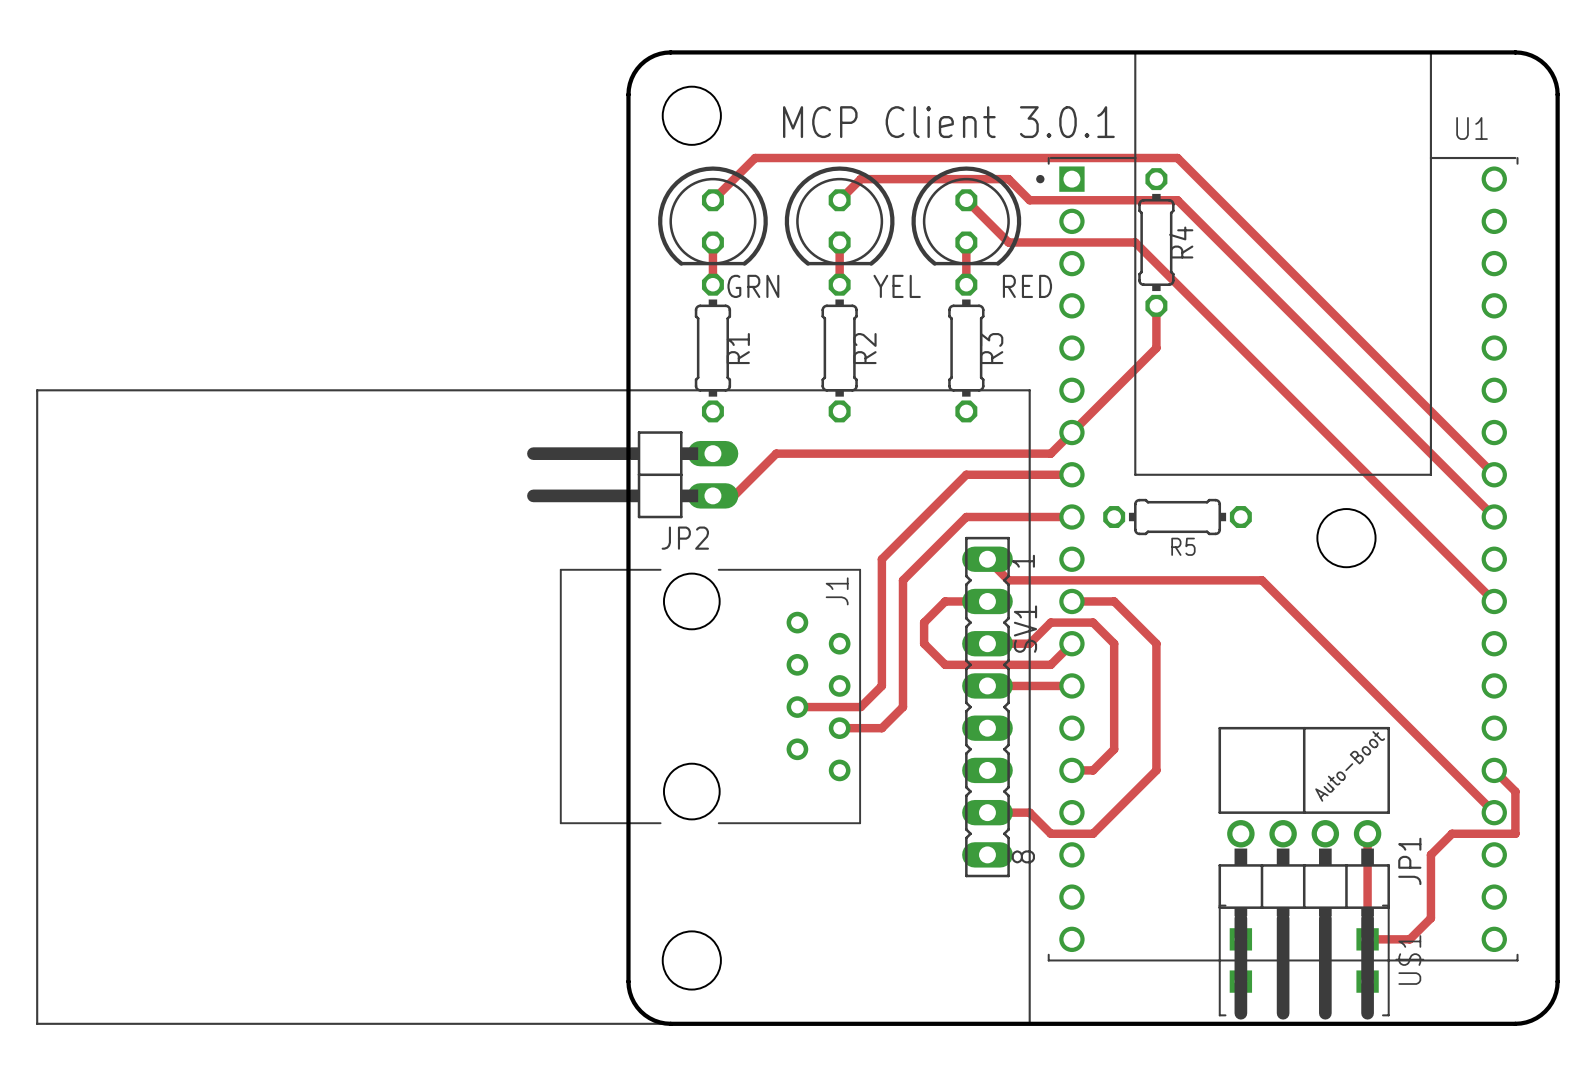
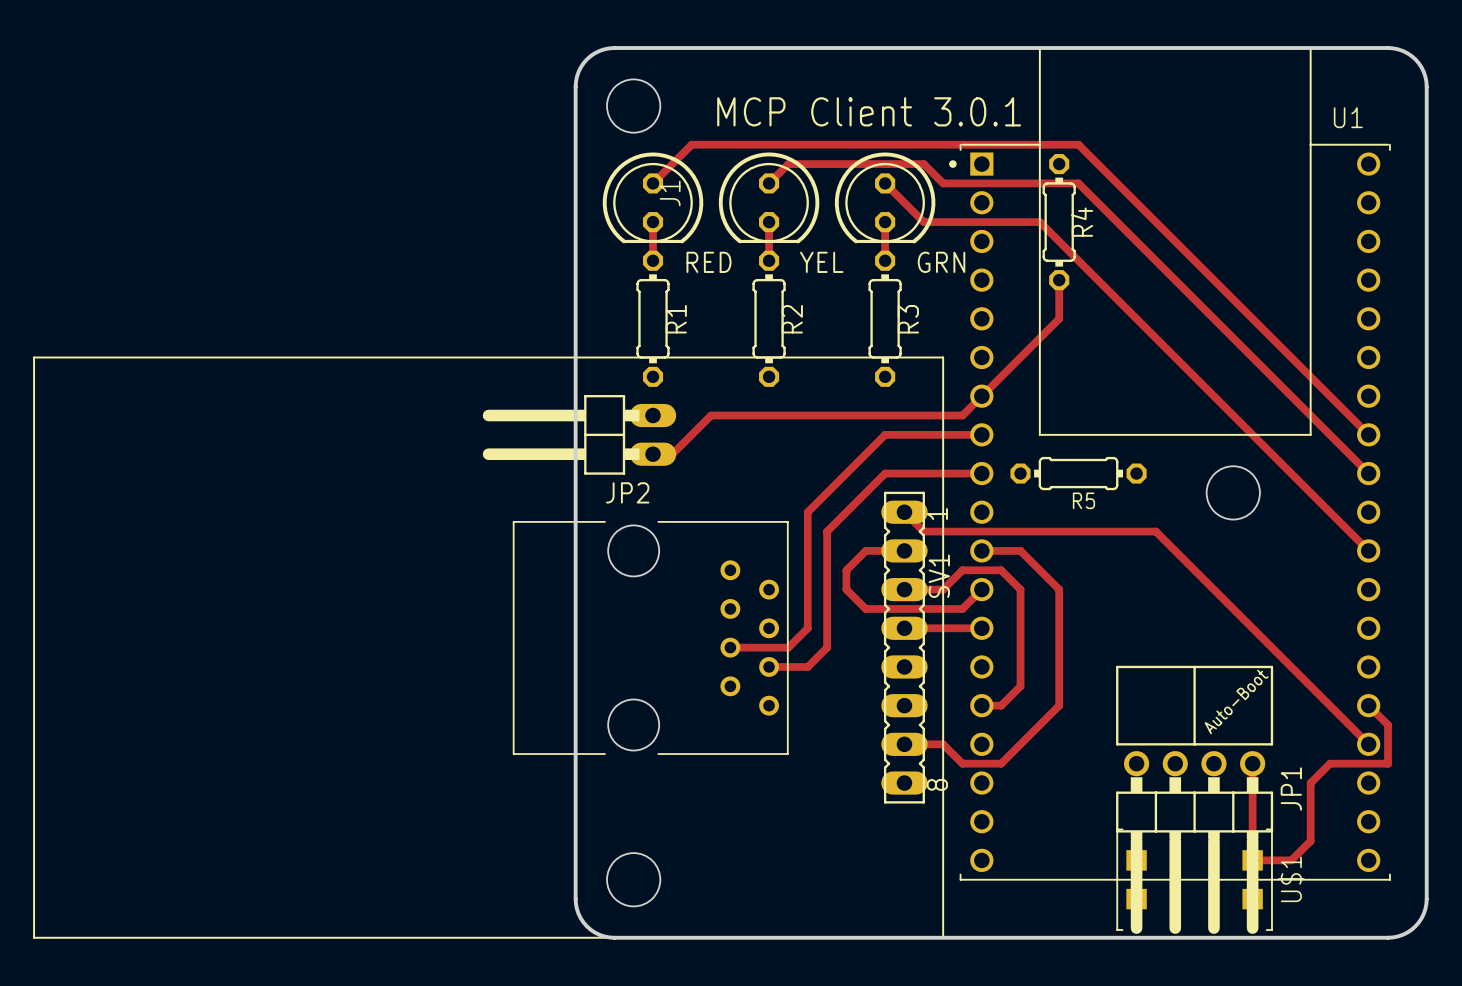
GRN name: GRN (753, 286) -> RED (709, 262)
RED name: RED (1027, 286) -> GRN (941, 262)
J1 name position: J1 (837, 591) -> J1 (670, 193)

